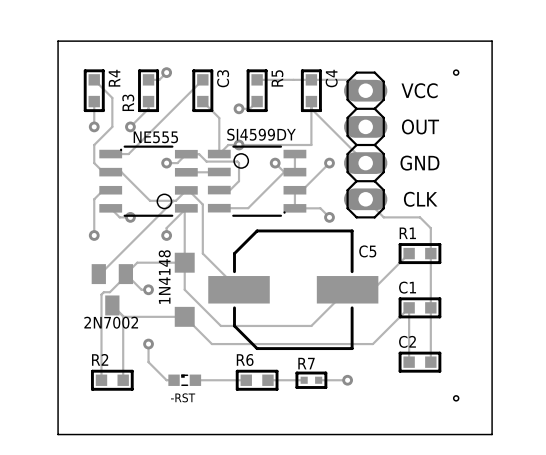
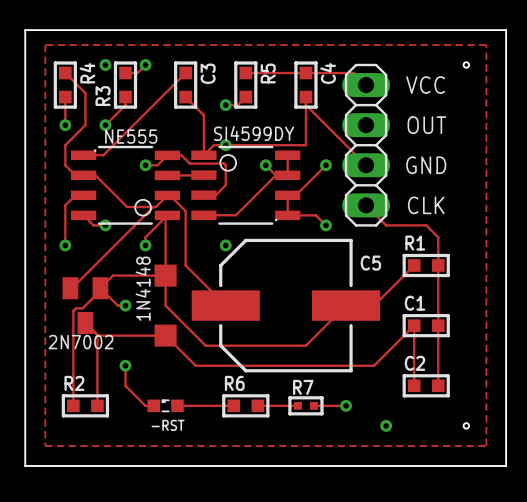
zone outline: none -> (45, 44) (486, 44) (486, 445) (45, 445) (45, 44)
via: none -> (105, 65)
via: none -> (225, 245)
via: none -> (386, 425)

